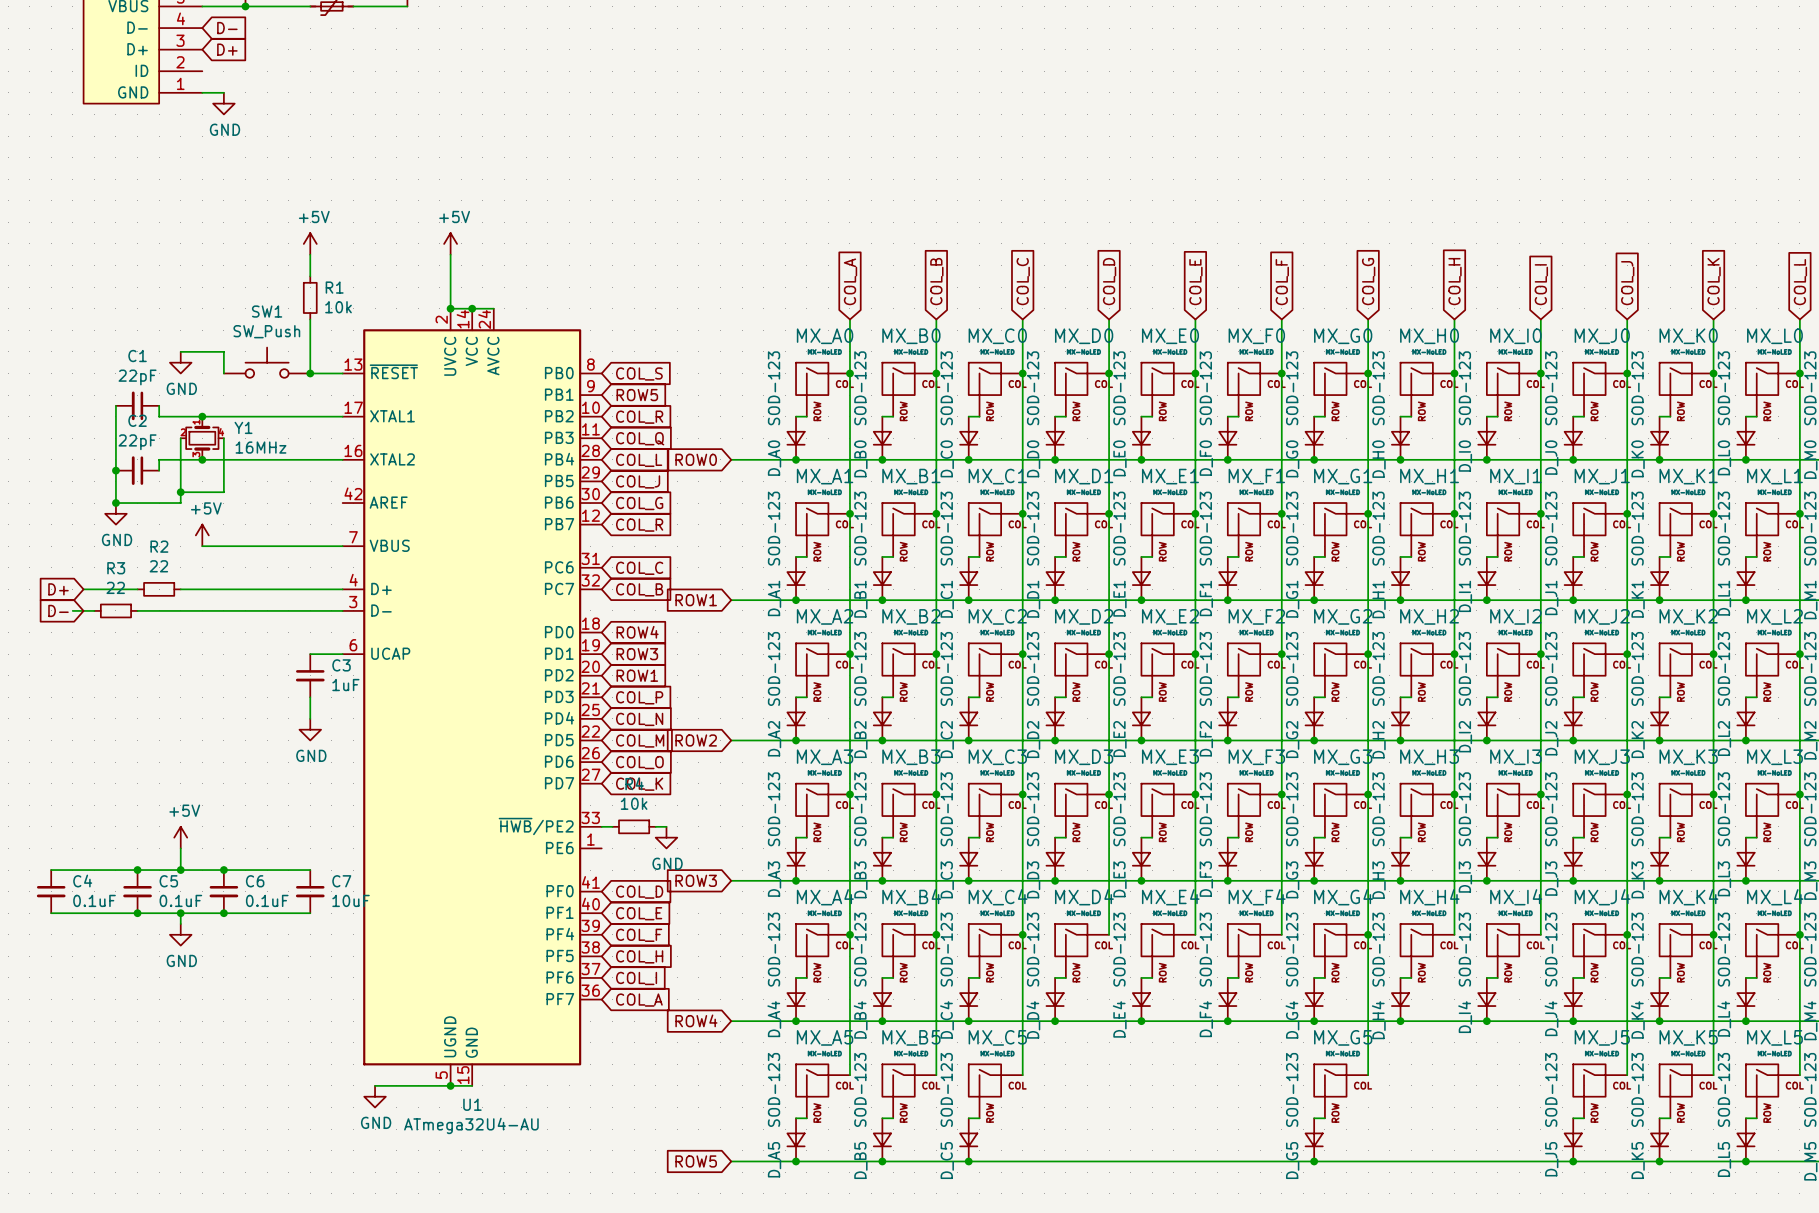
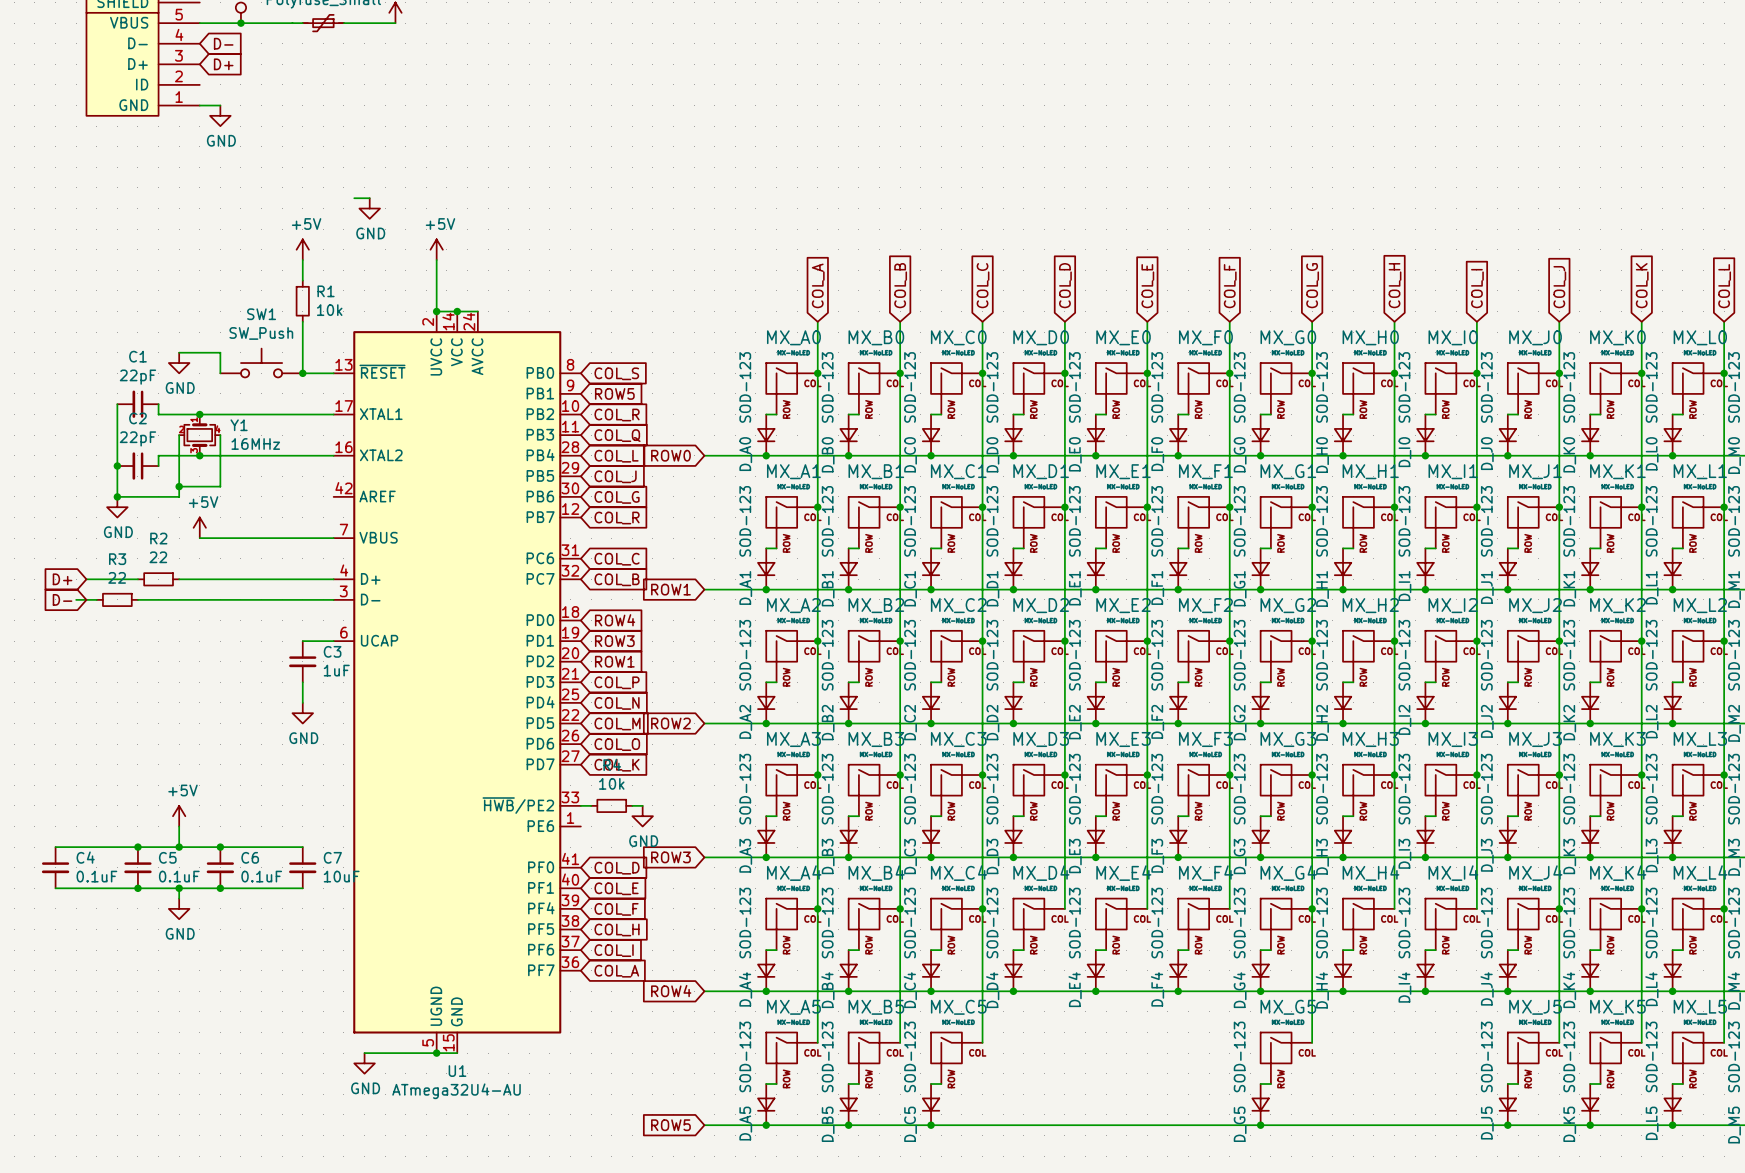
wire: none -> (354, 198) (369, 198)
power symbol: none -> GND (369, 208)

